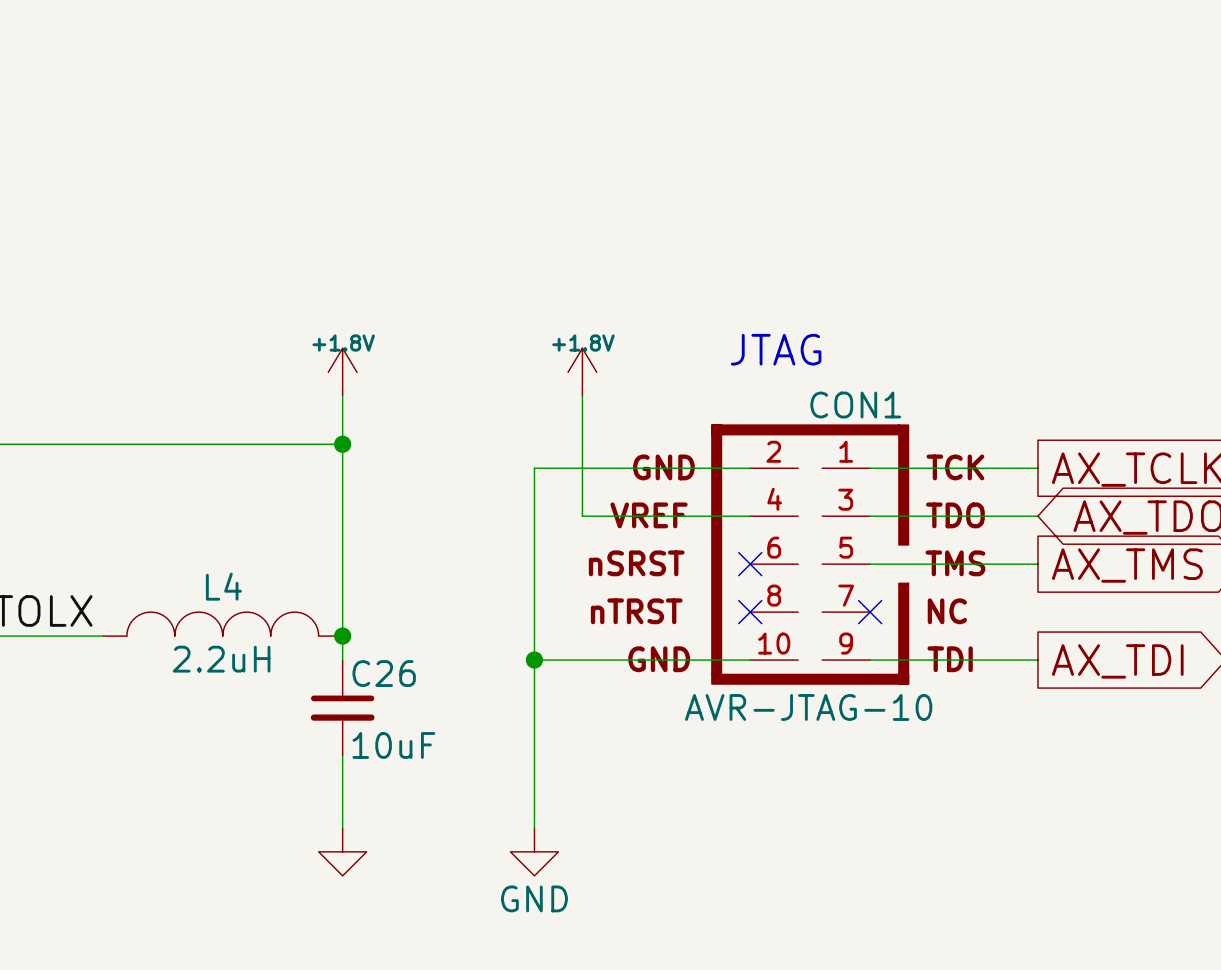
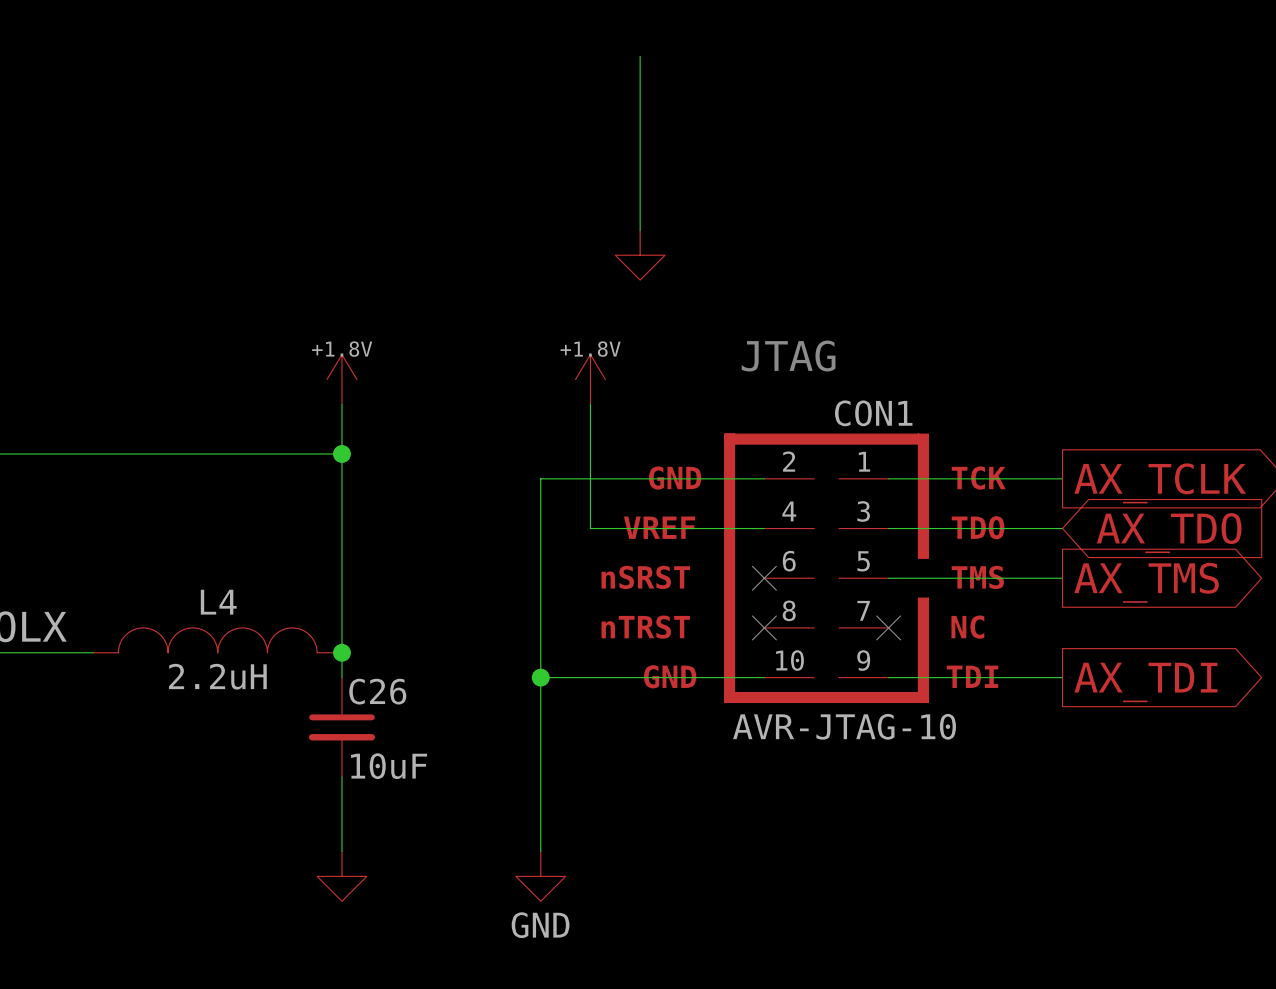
wire: none -> (640, 56) (640, 230)
power symbol: none -> (640, 255)

